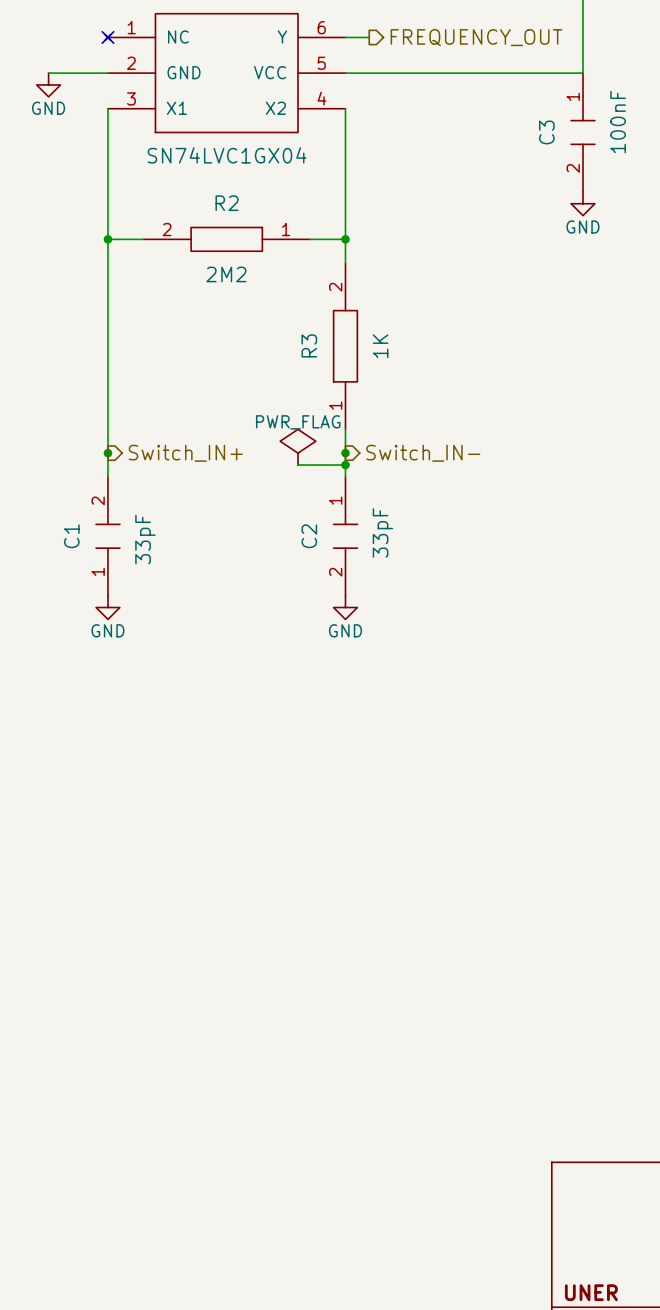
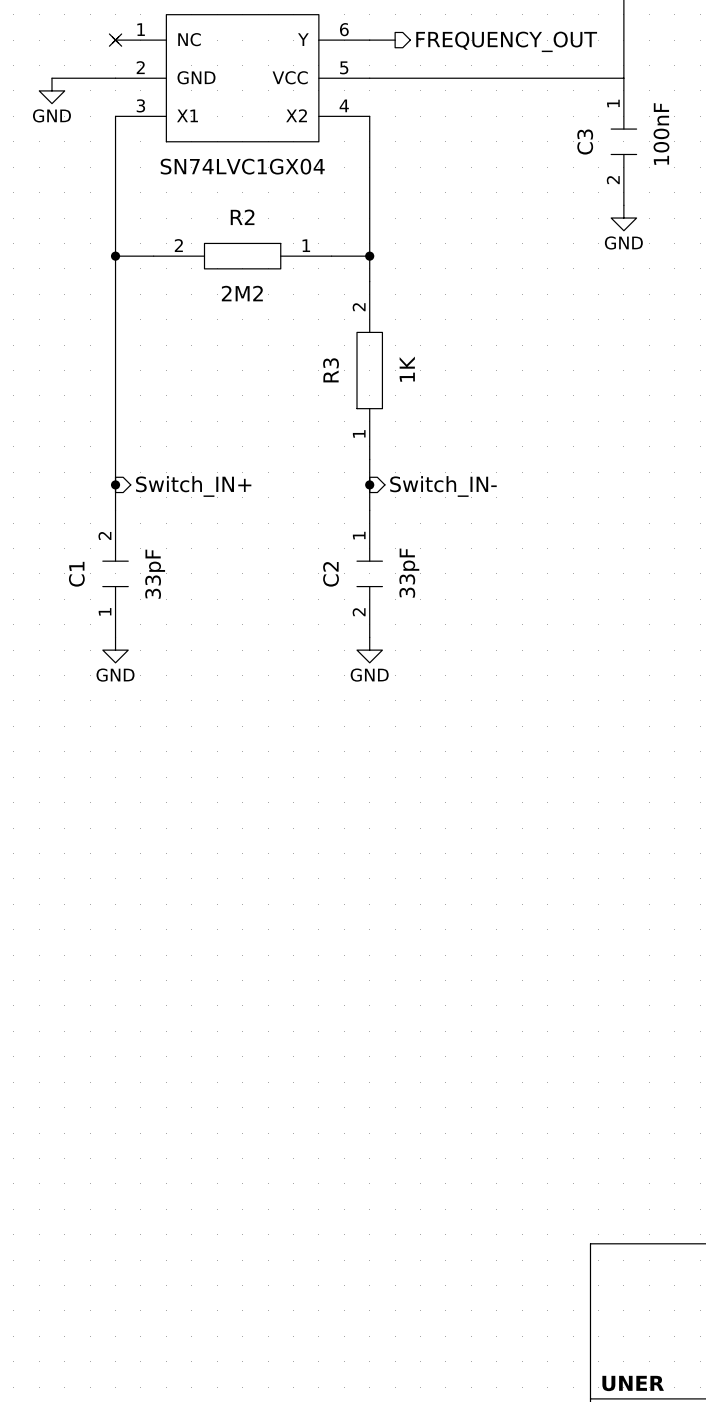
power symbol: PWR_FLAG (297, 447) -> none
wire: (297, 465) (345, 465) -> none
junction: (345, 465) -> none

